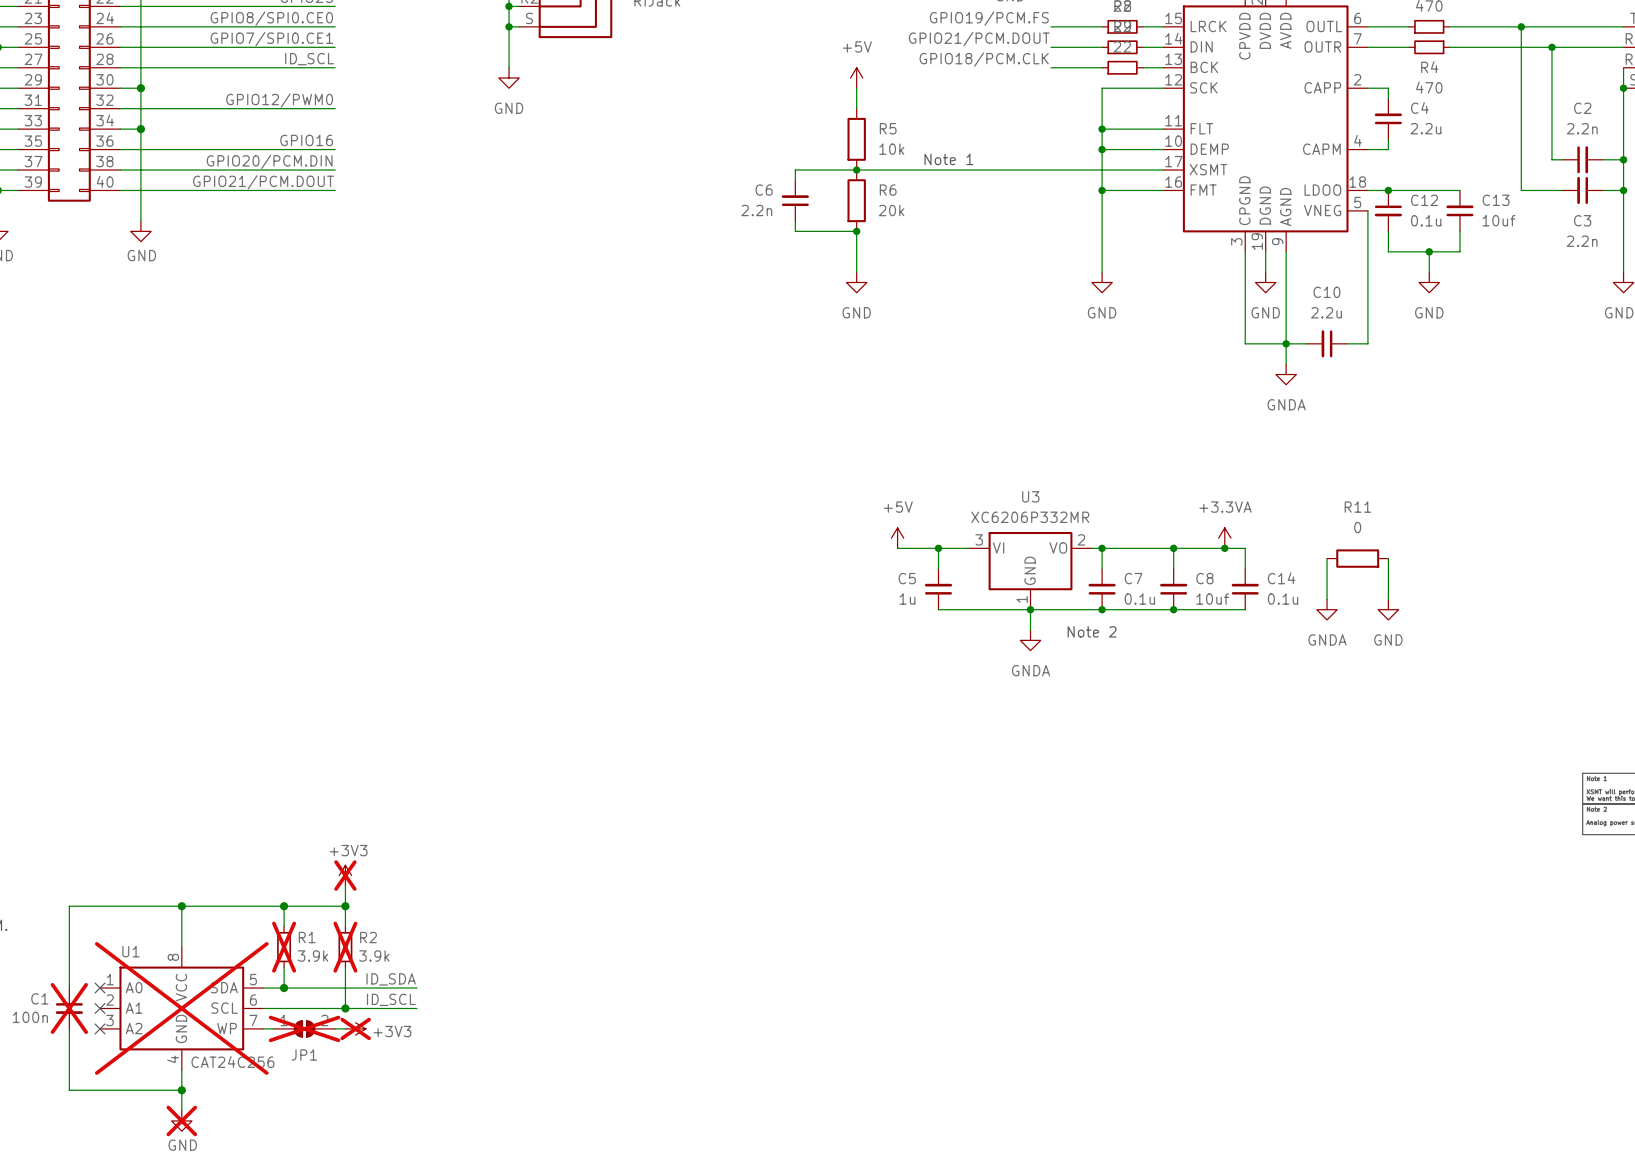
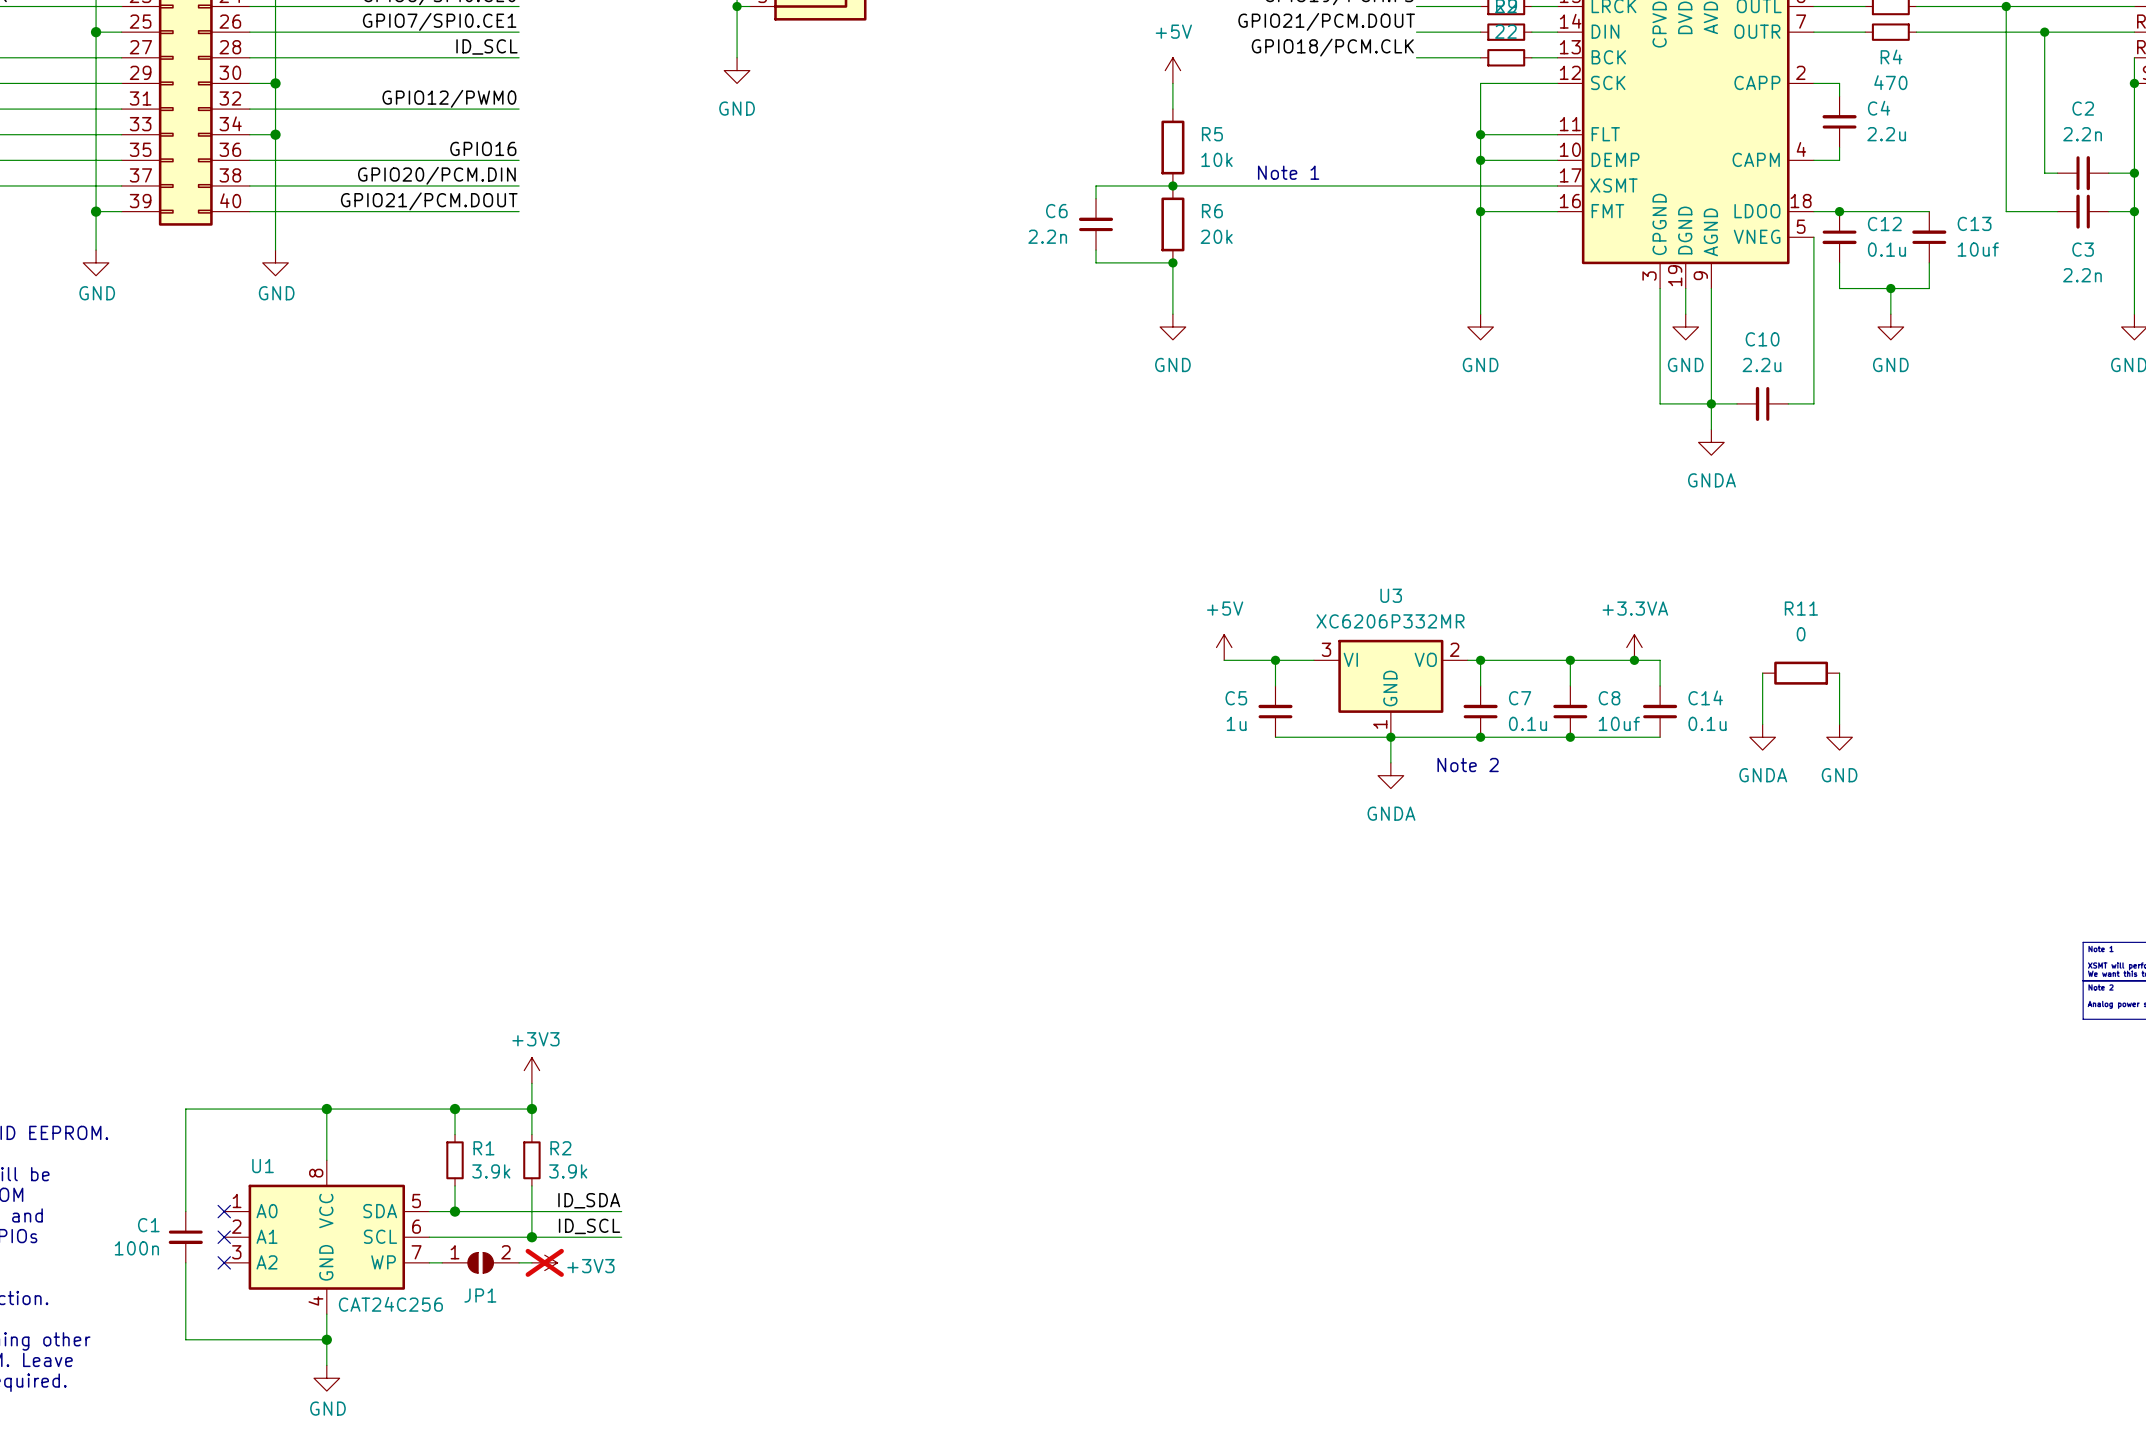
power symbol do-not-place cross: (345, 875) -> none
R1 do-not-place cross: (284, 947) -> none
R2 do-not-place cross: (345, 947) -> none
C1 do-not-place cross: (69, 1008) -> none
U1 do-not-place cross: (181, 1008) -> none
JP1 do-not-place cross: (304, 1028) -> none
power symbol do-not-place cross: (181, 1120) -> none

